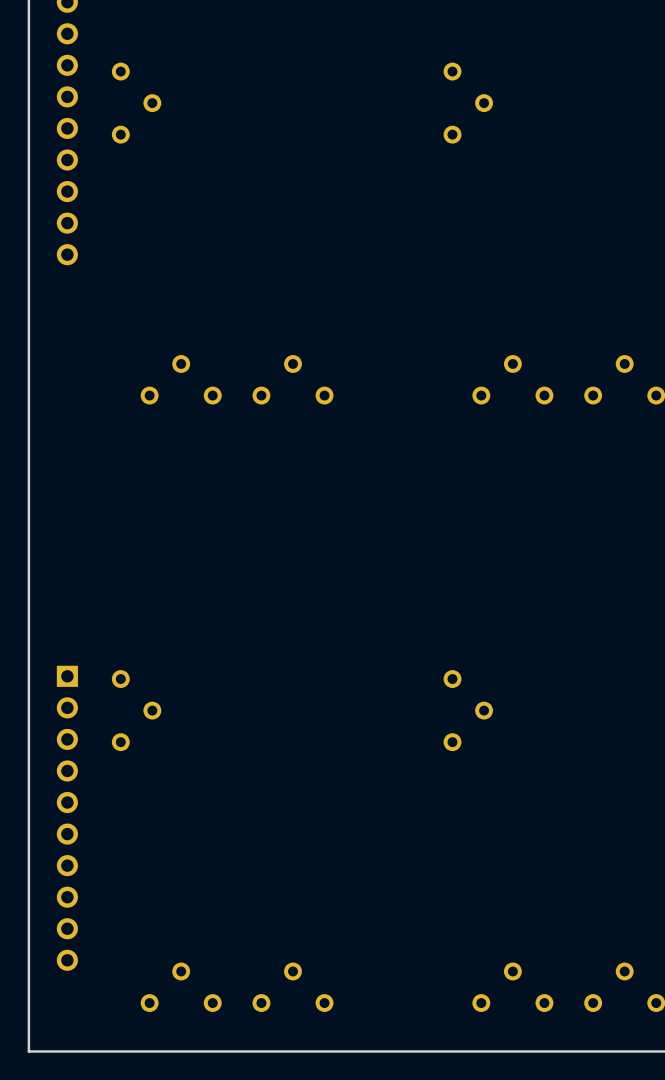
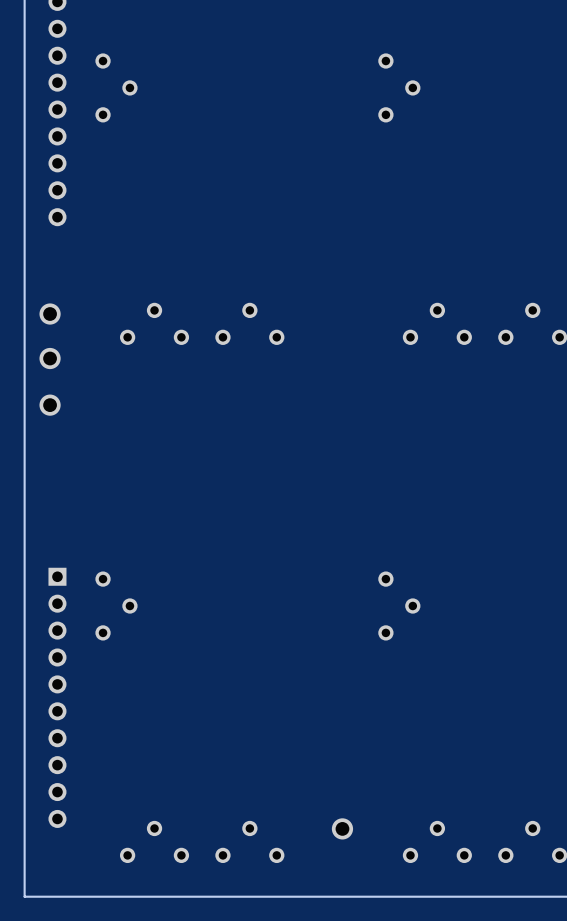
part: none -> (50, 314)
part: none -> (50, 358)
part: none -> (50, 405)
part: none -> (342, 828)

